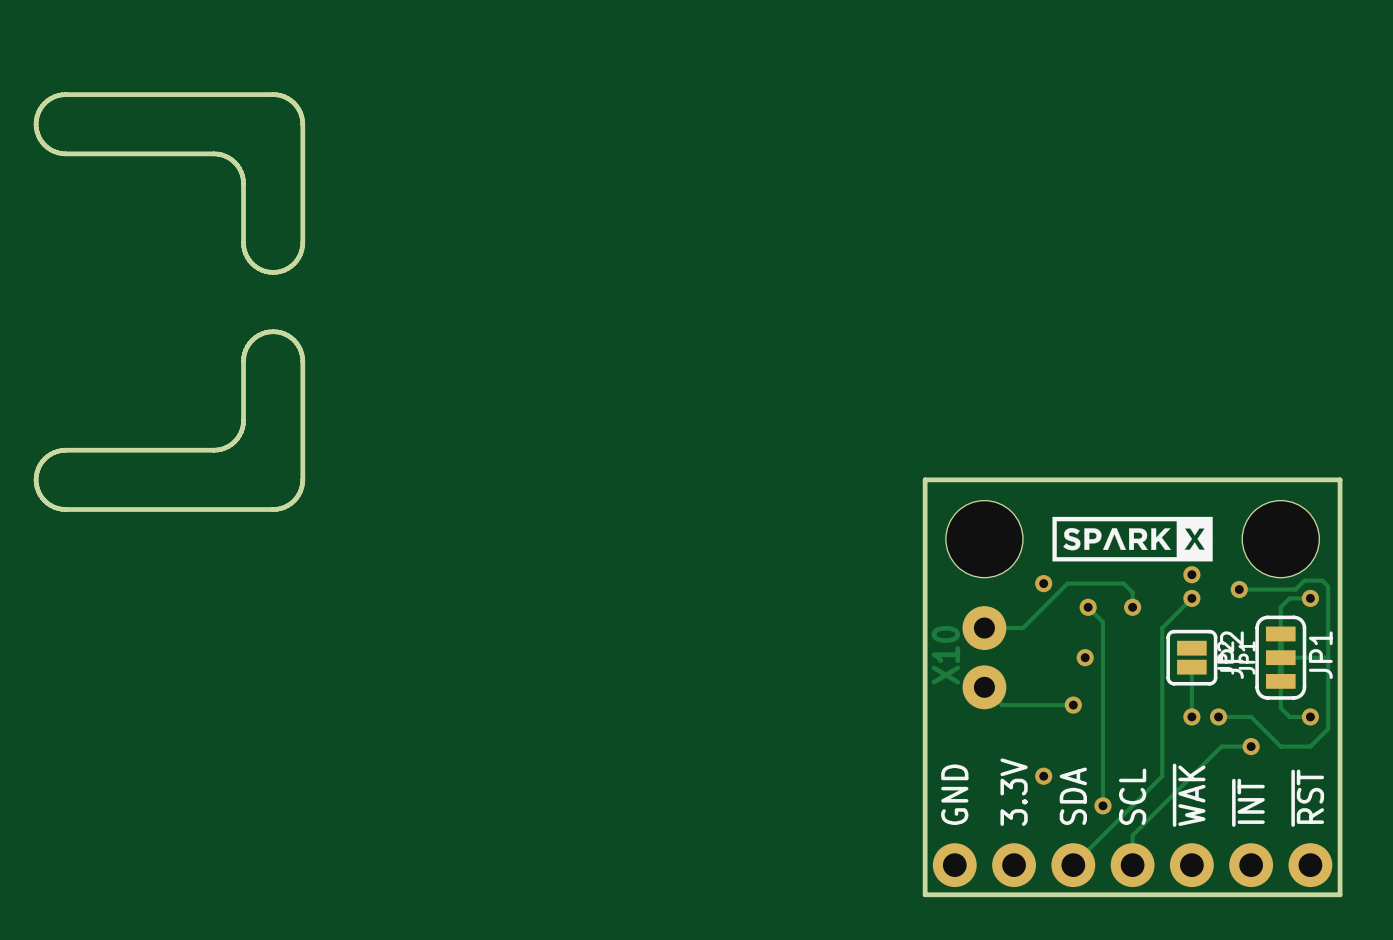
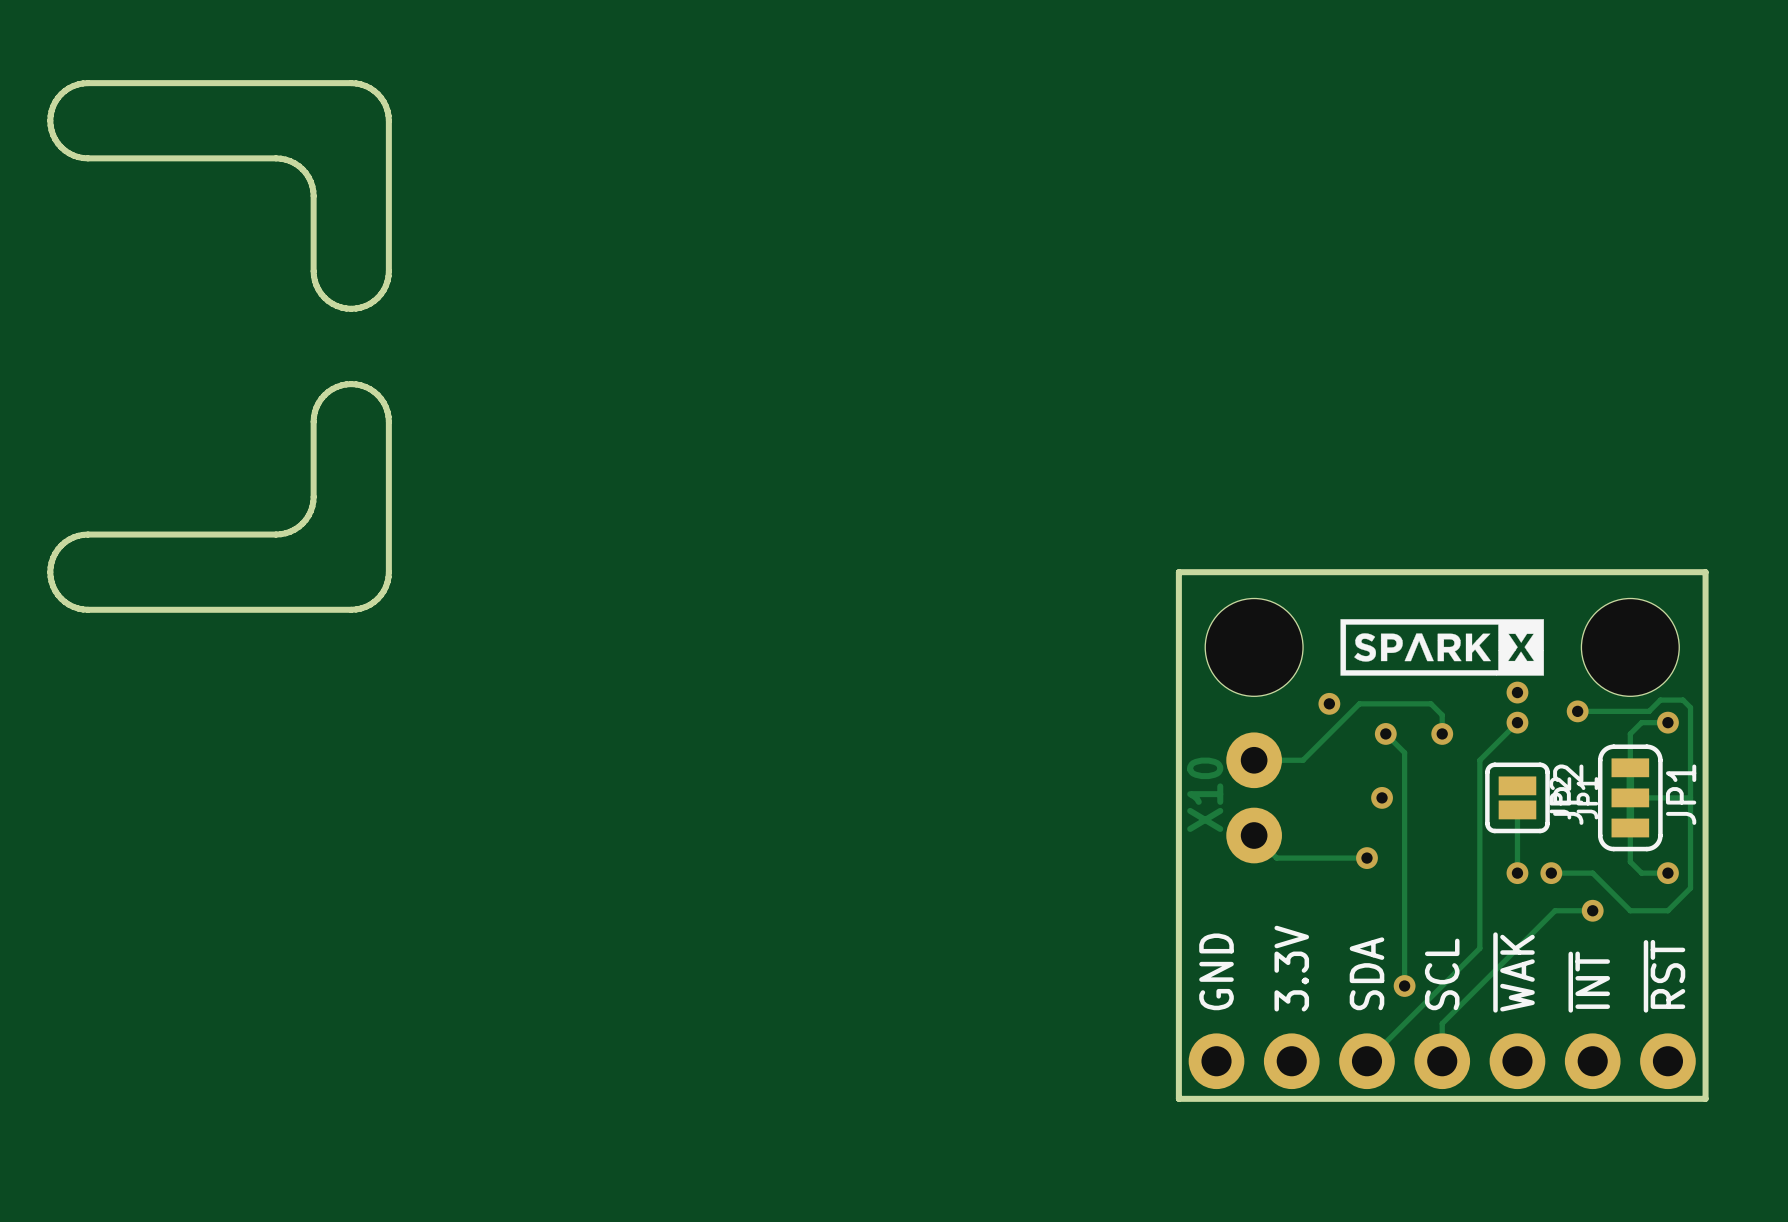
via: (1043, 776) -> none

